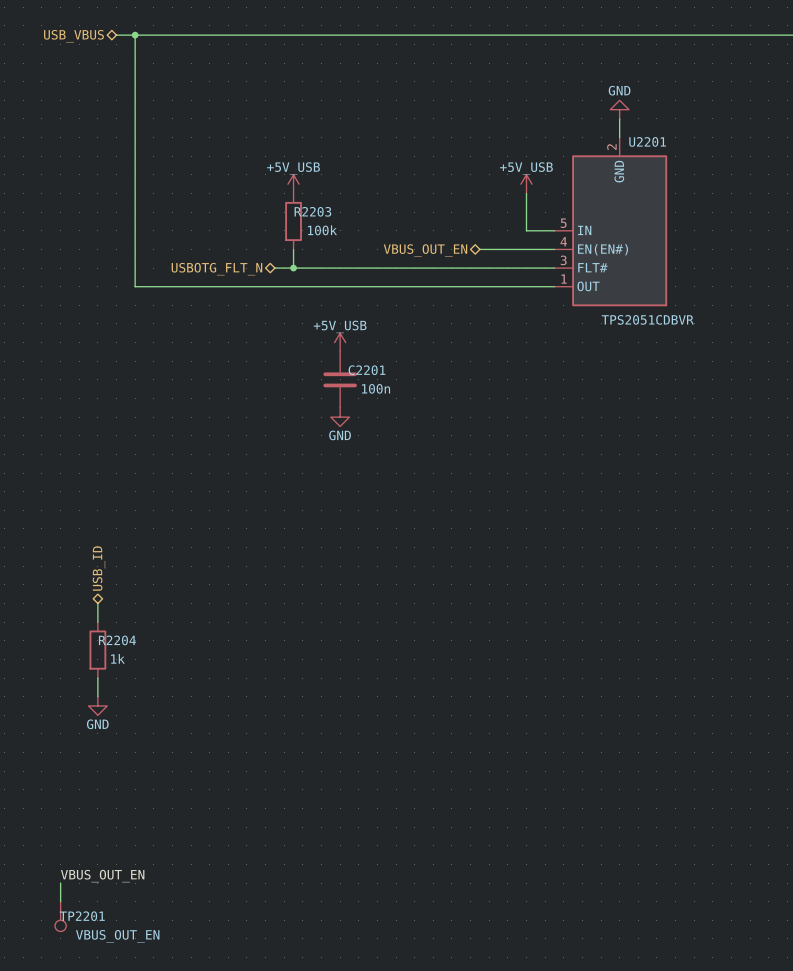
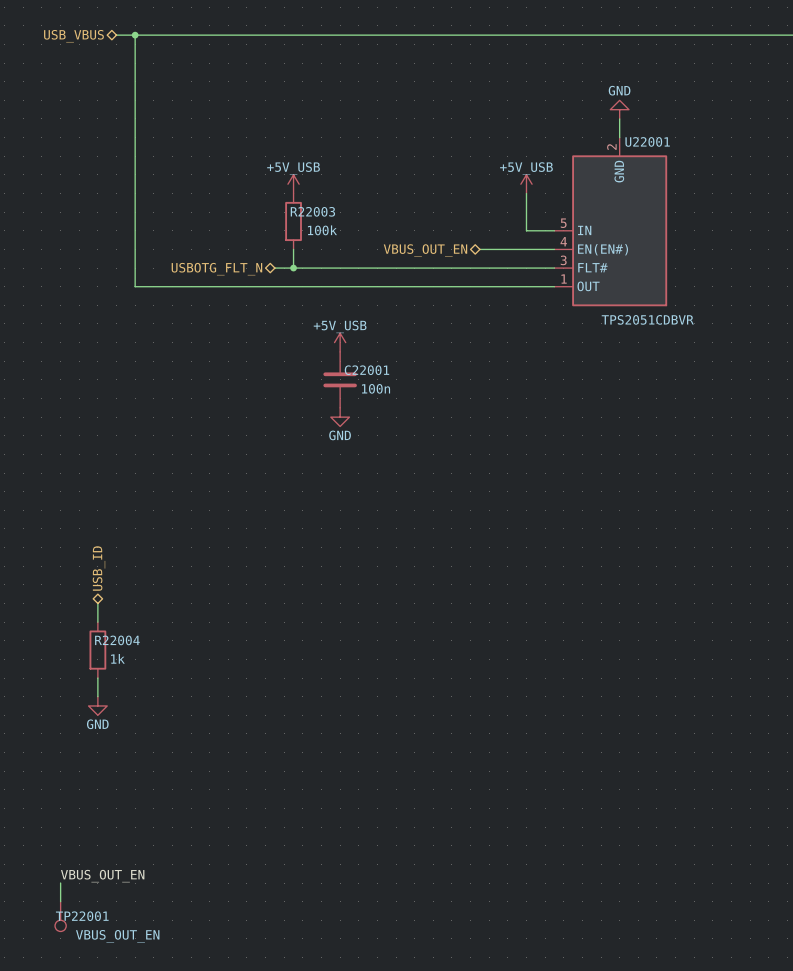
U2201 name: U2201 (647, 141) -> U22001 (647, 141)
R2203 name: R2203 (312, 211) -> R22003 (312, 211)
C2201 name: C2201 (366, 370) -> C22001 (366, 370)
R2204 name: R2204 (117, 640) -> R22004 (117, 640)
TP2201 name: TP2201 (82, 916) -> TP22001 (82, 916)

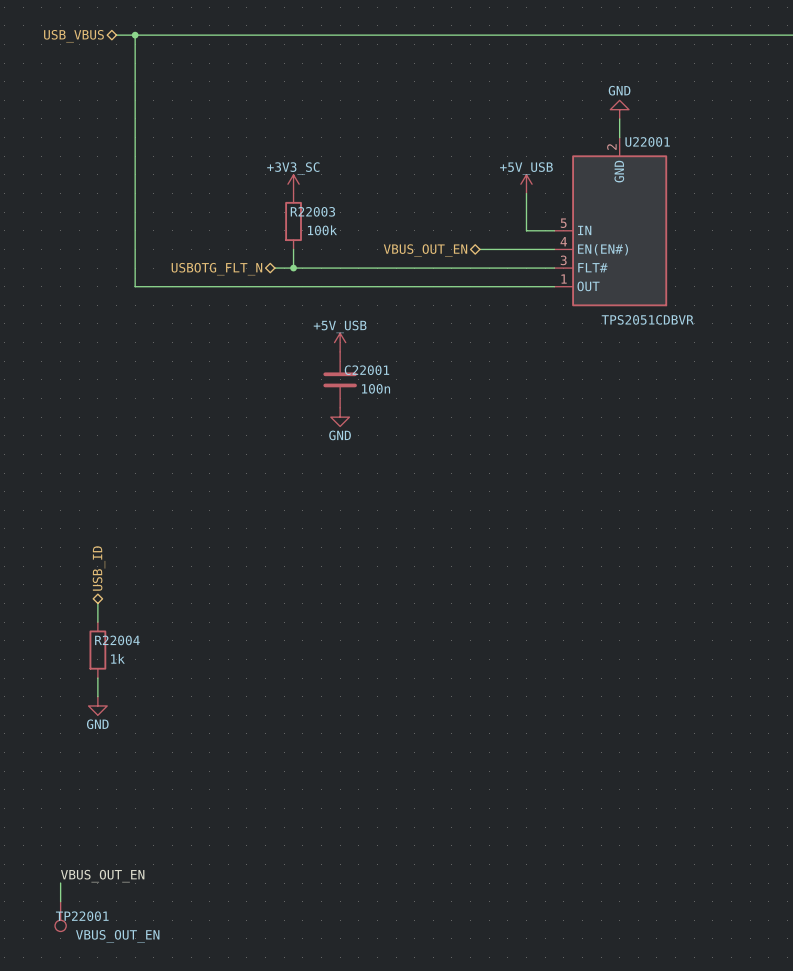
power symbol: +5V_USB (293, 184) -> +3V3_SC (293, 184)

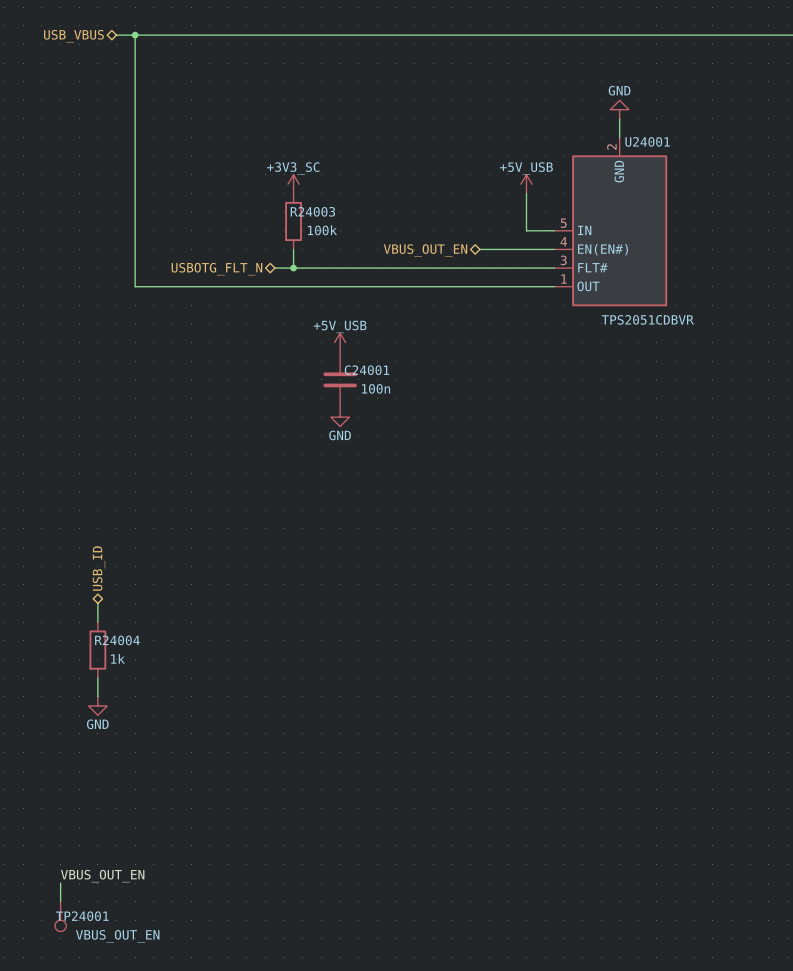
U22001 name: U22001 (647, 141) -> U24001 (647, 141)
R22003 name: R22003 (312, 211) -> R24003 (312, 211)
C22001 name: C22001 (366, 370) -> C24001 (366, 370)
R22004 name: R22004 (117, 640) -> R24004 (117, 640)
TP22001 name: TP22001 (82, 916) -> TP24001 (82, 916)

